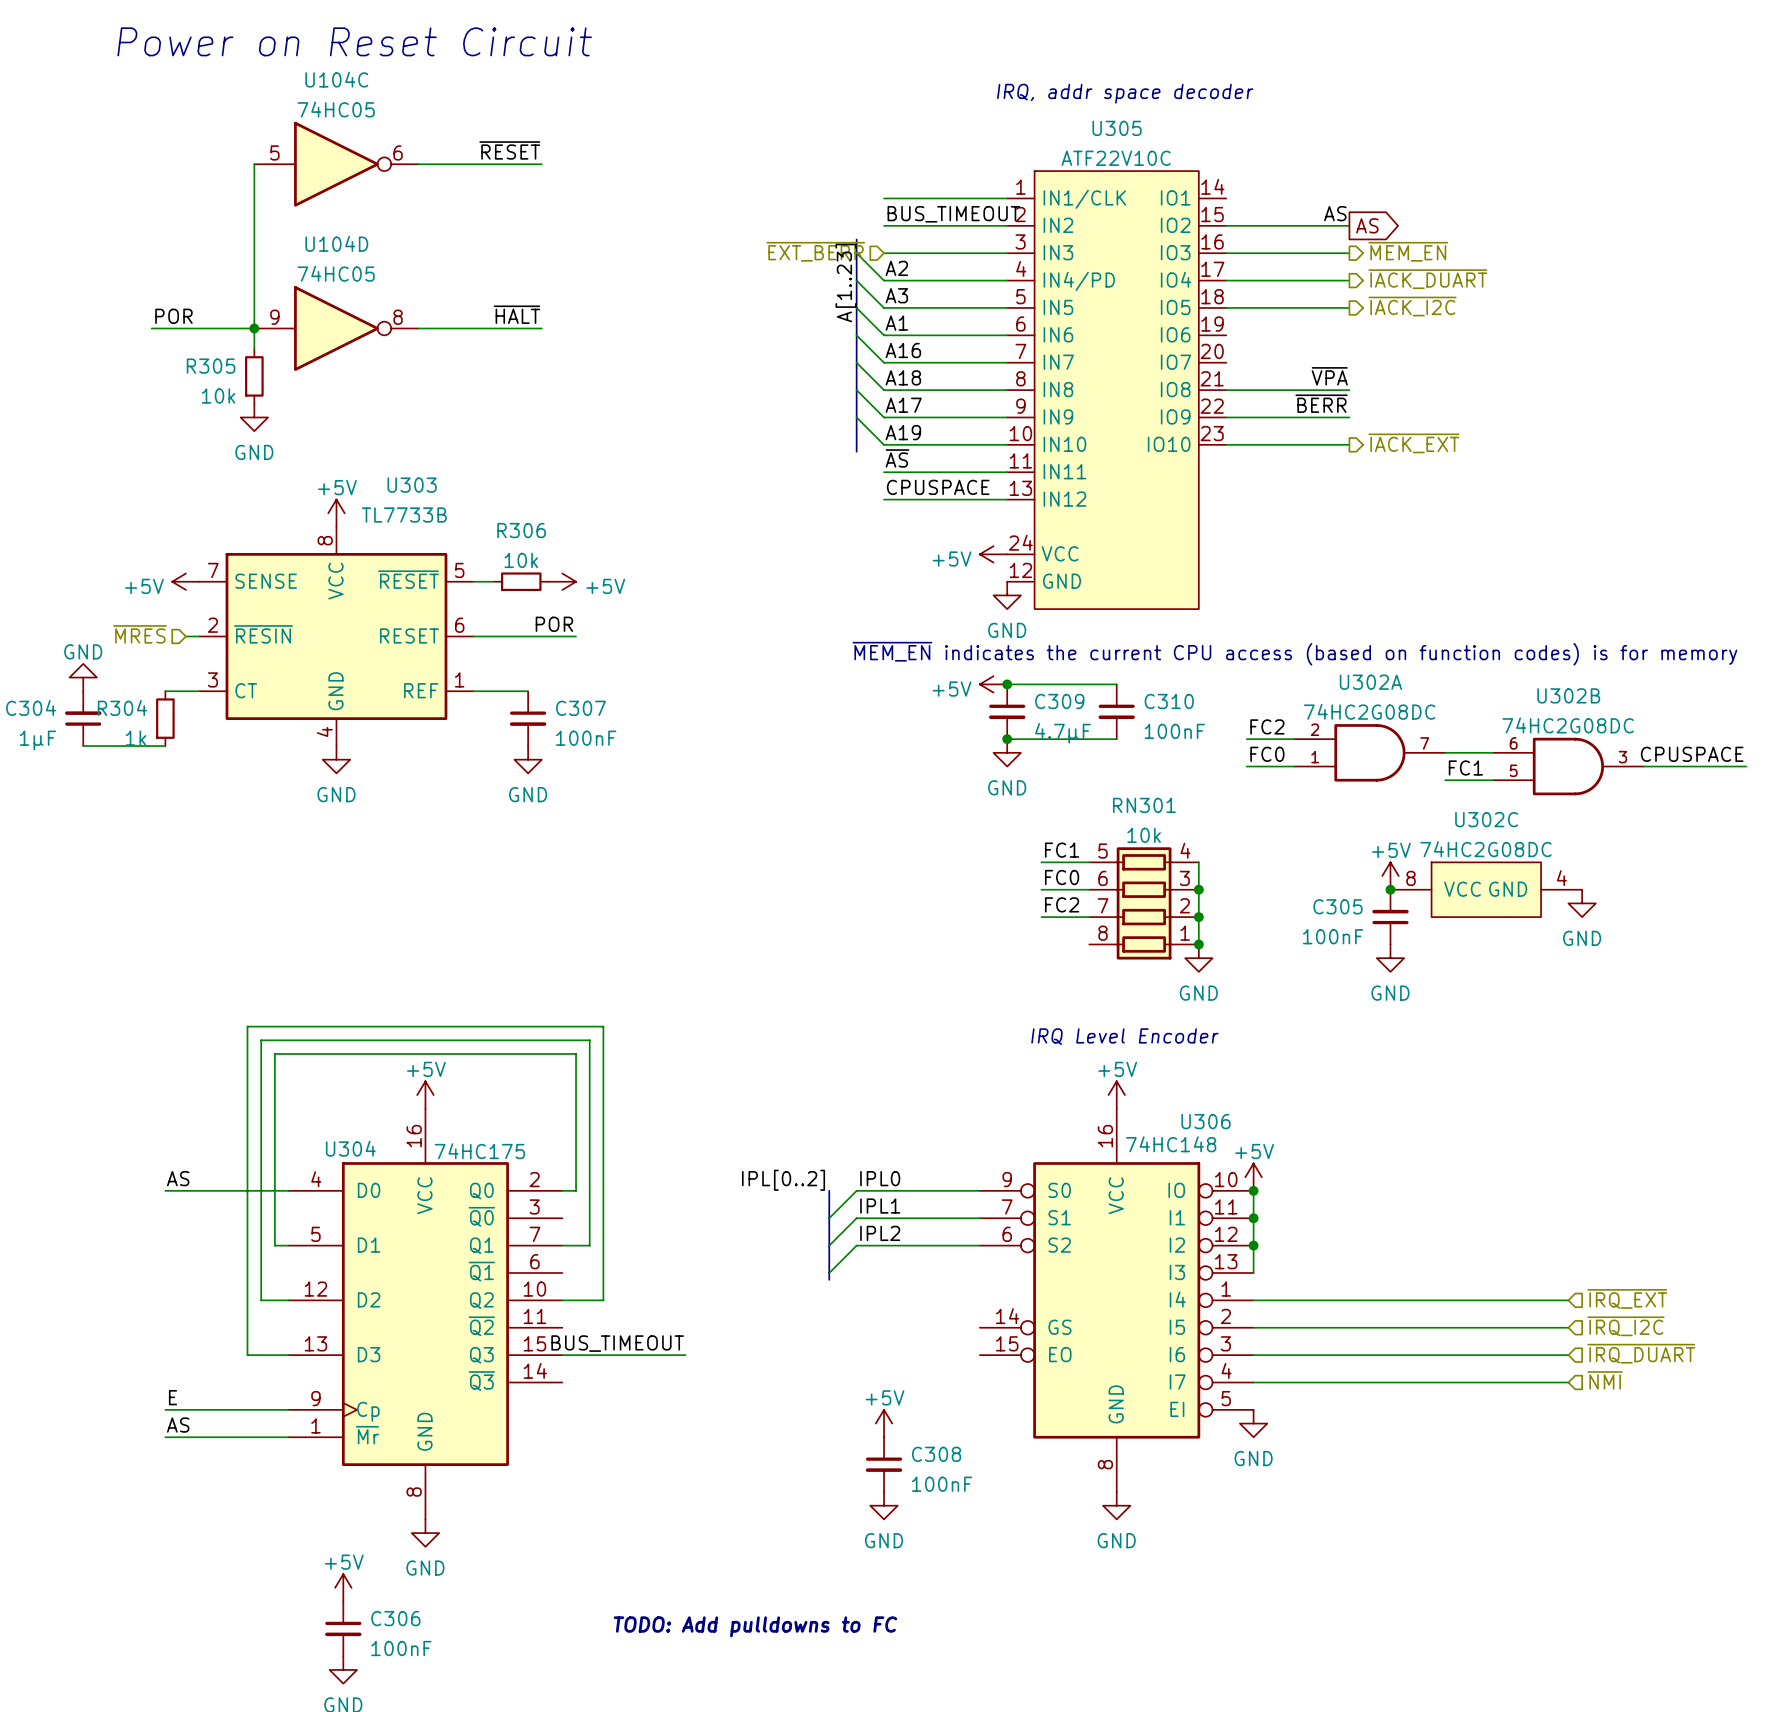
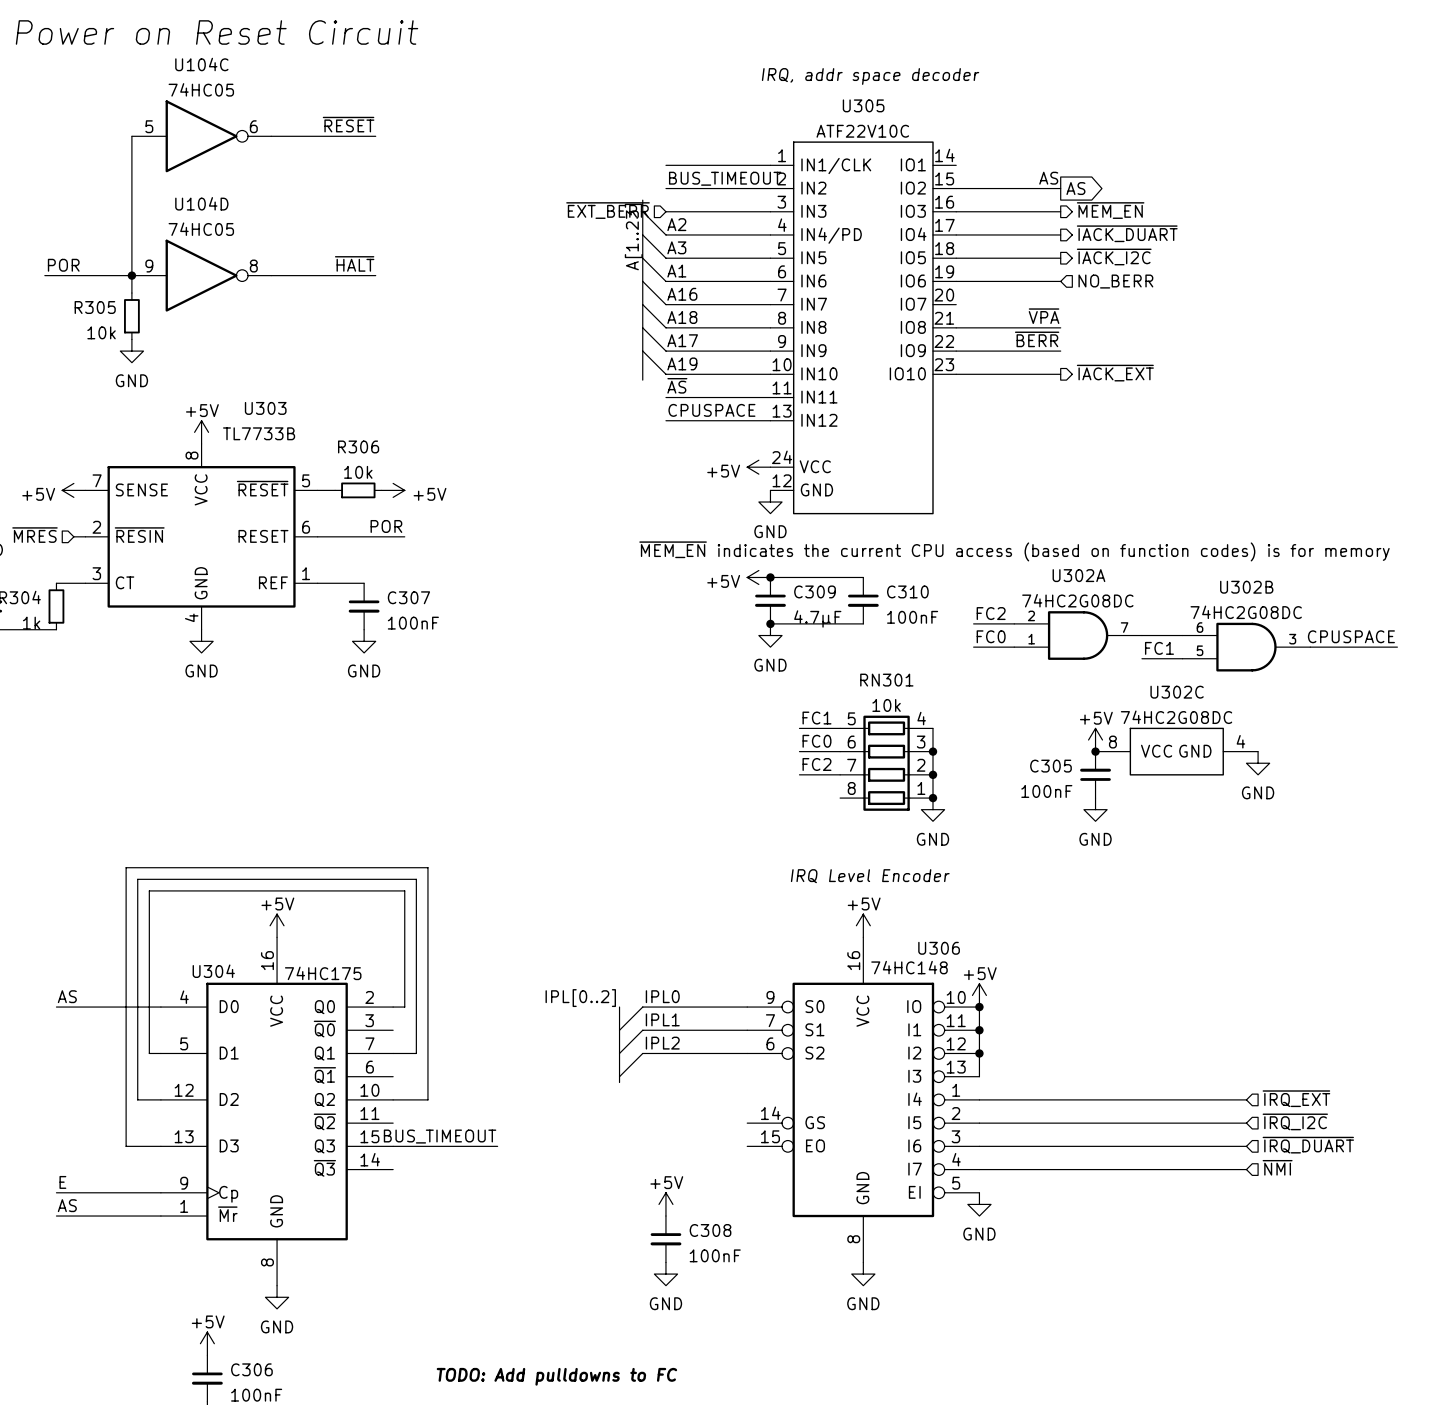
wire: none -> (956, 281) (1060, 281)
hierarchical label: none -> NO_BERR (1115, 281)

